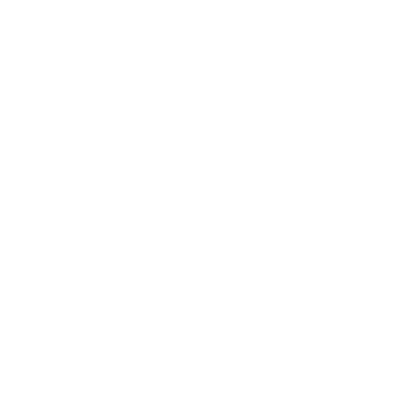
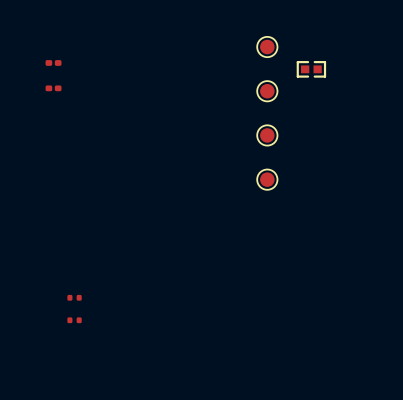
part: none -> (267, 47)
part: none -> (53, 62)
part: none -> (311, 69)
part: none -> (53, 88)
part: none -> (267, 91)
part: none -> (267, 135)
part: none -> (267, 179)
part: none -> (74, 297)
part: none -> (74, 320)

